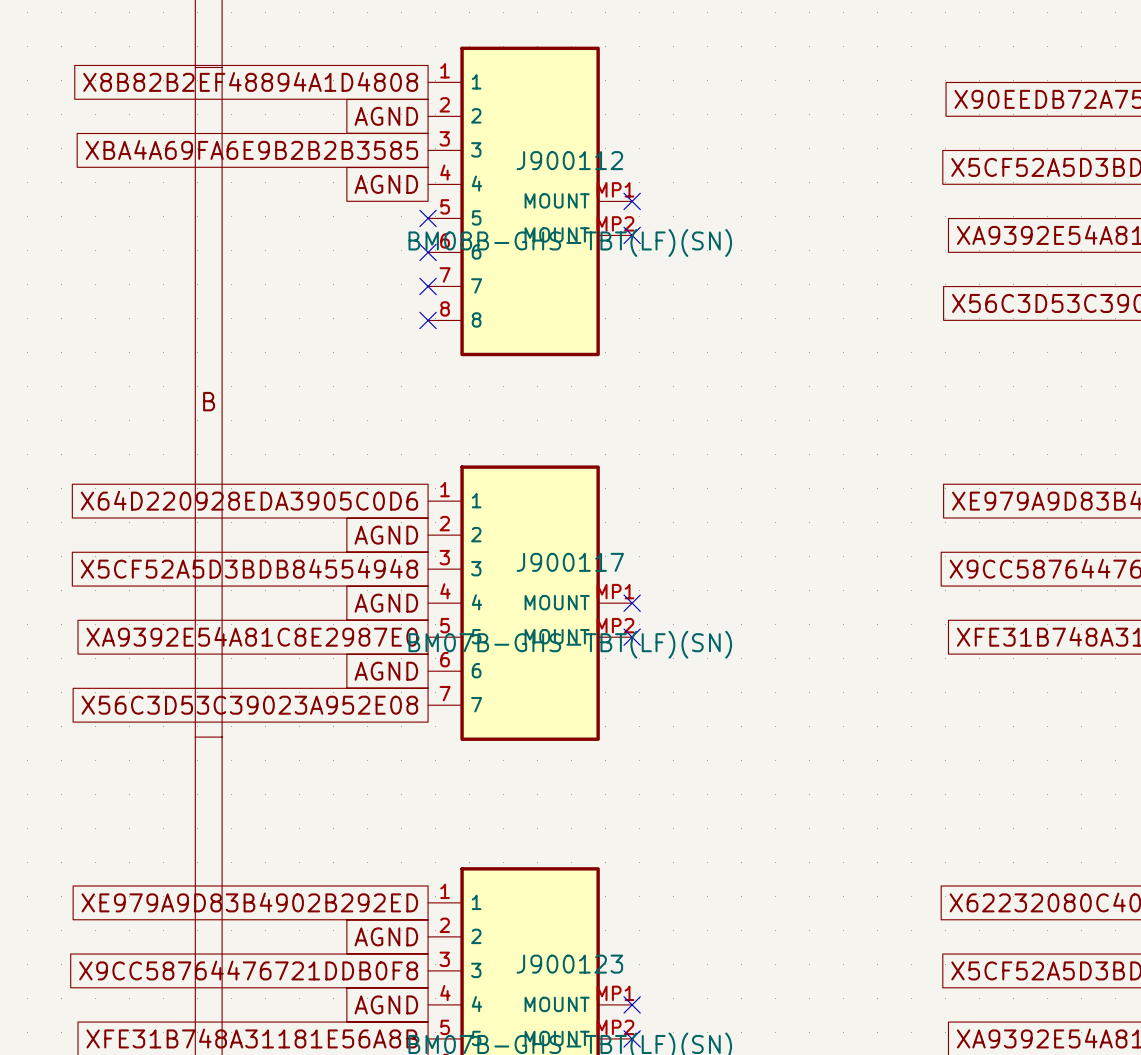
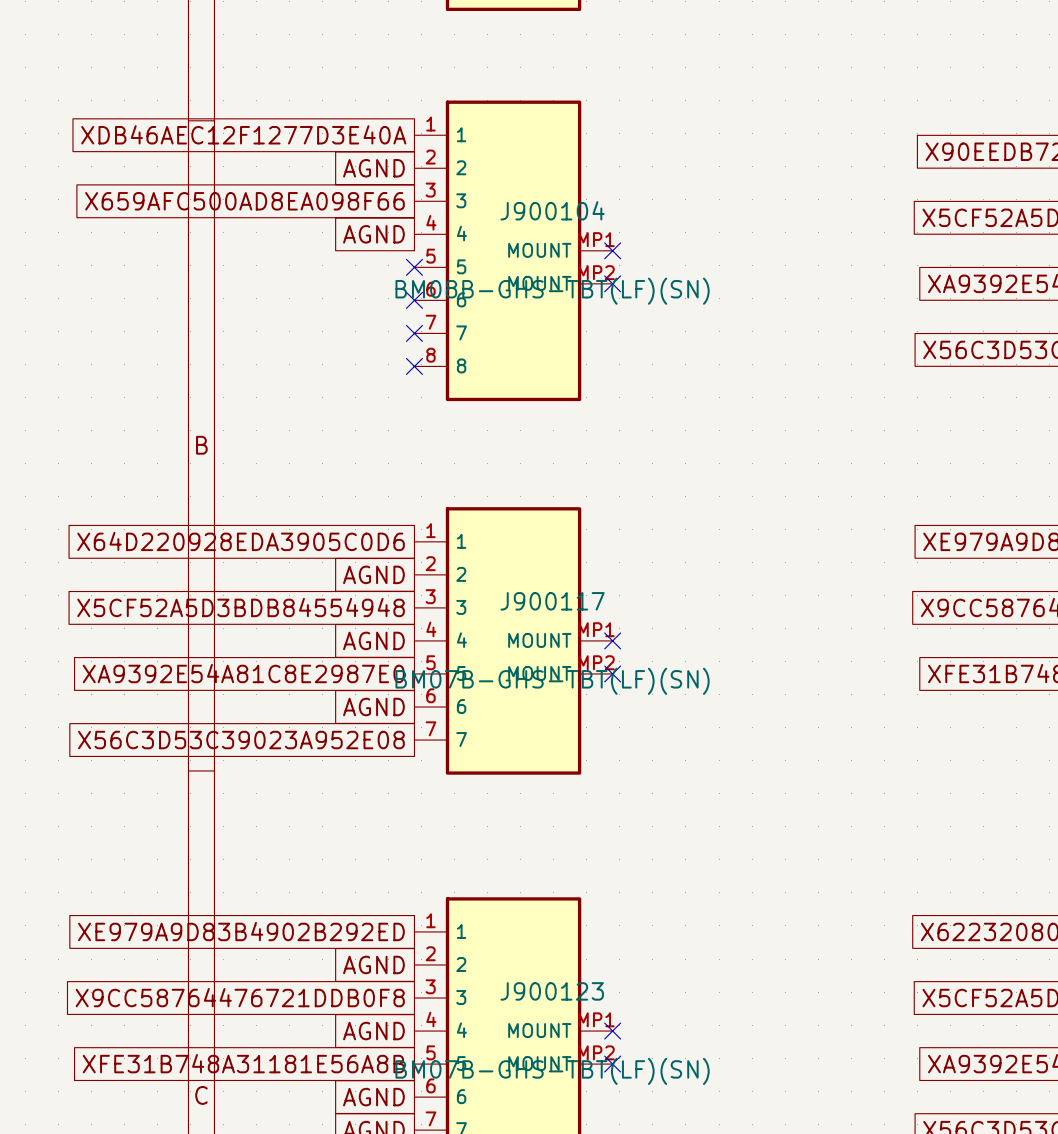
global label: X8B82B2EF48894A1D4808 (250, 81) -> XDB46AEC12F1277D3E40A (243, 134)
global label: XBA4A69FA6E9B2B2B3585 (251, 149) -> X659AFC500AD8EA098F66 (244, 201)
J900112 name: J900112 (569, 160) -> J900104 (552, 210)

